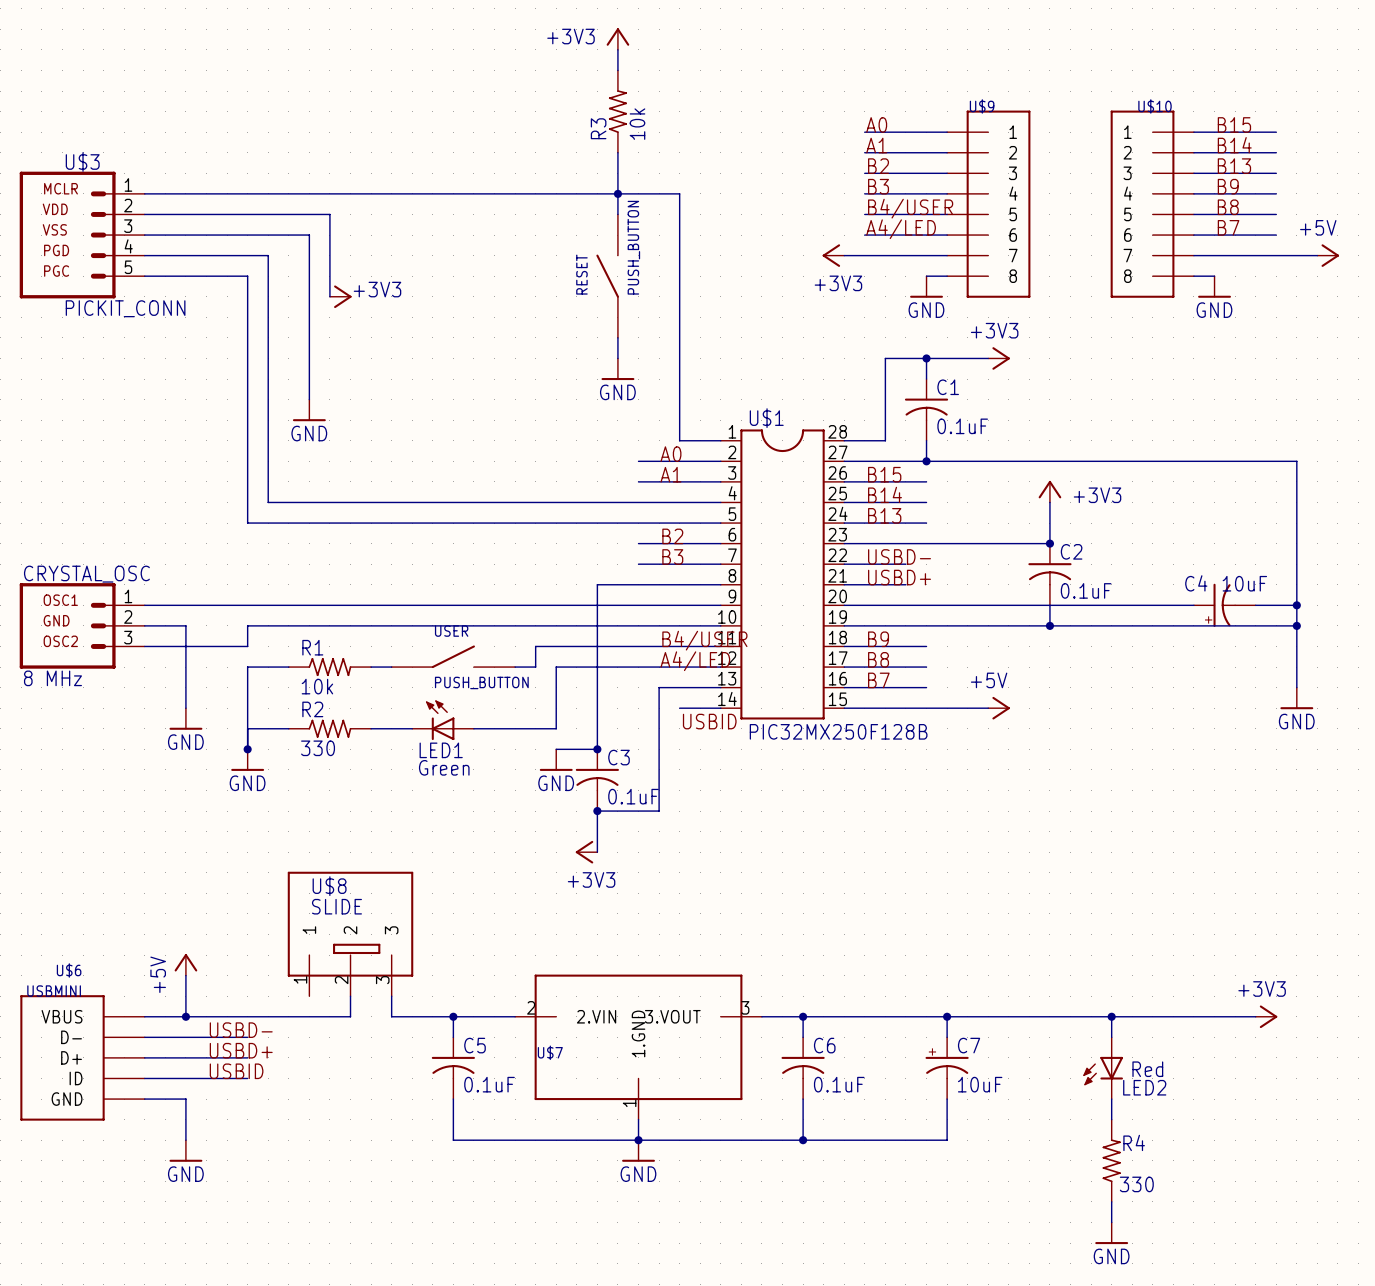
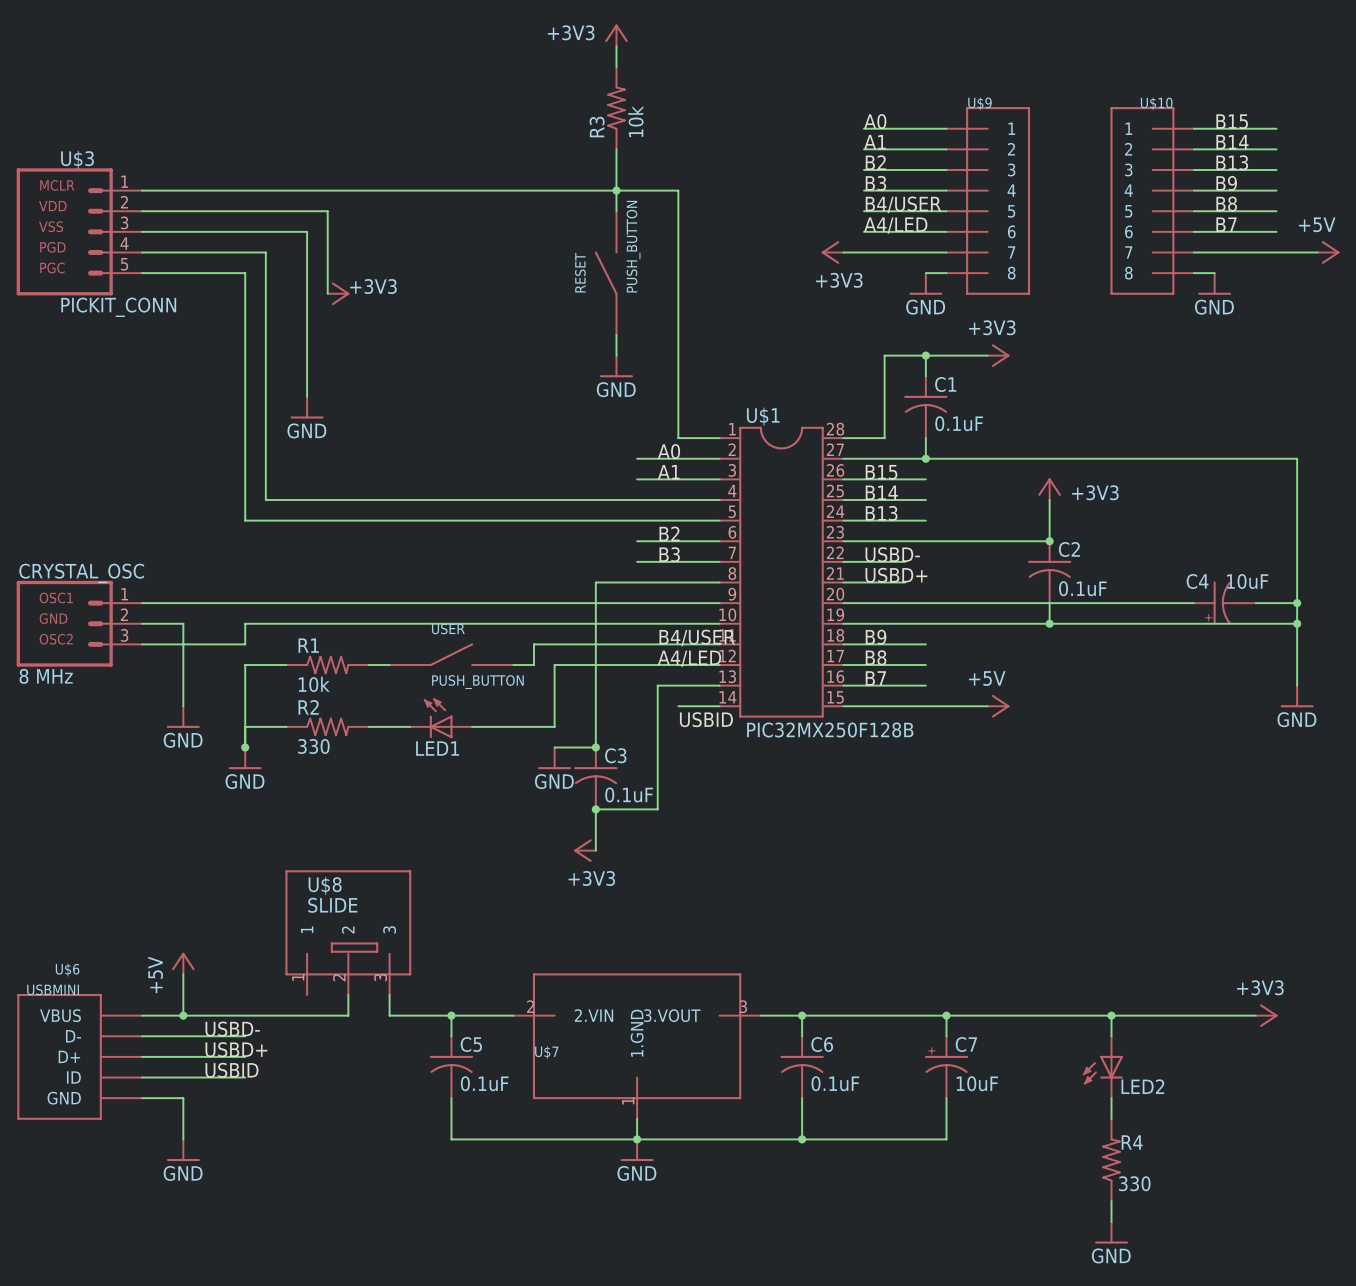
LED1 value: Green (444, 767) -> none
LED2 value: Red (1147, 1069) -> none

